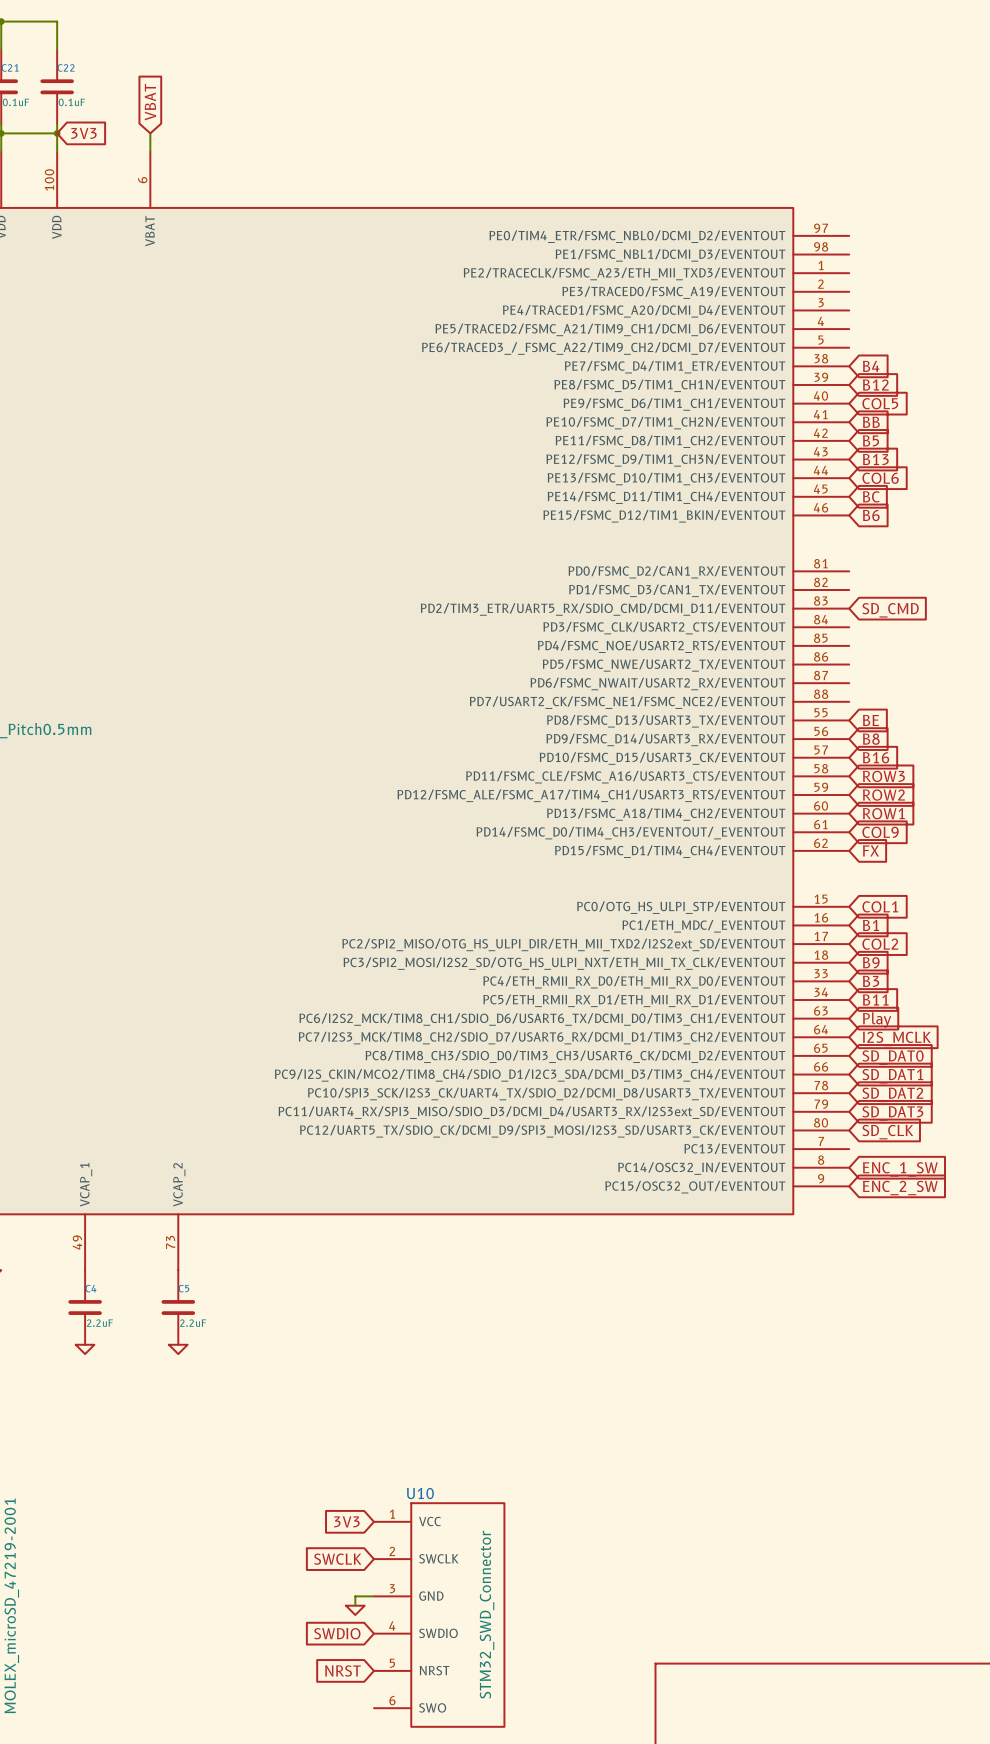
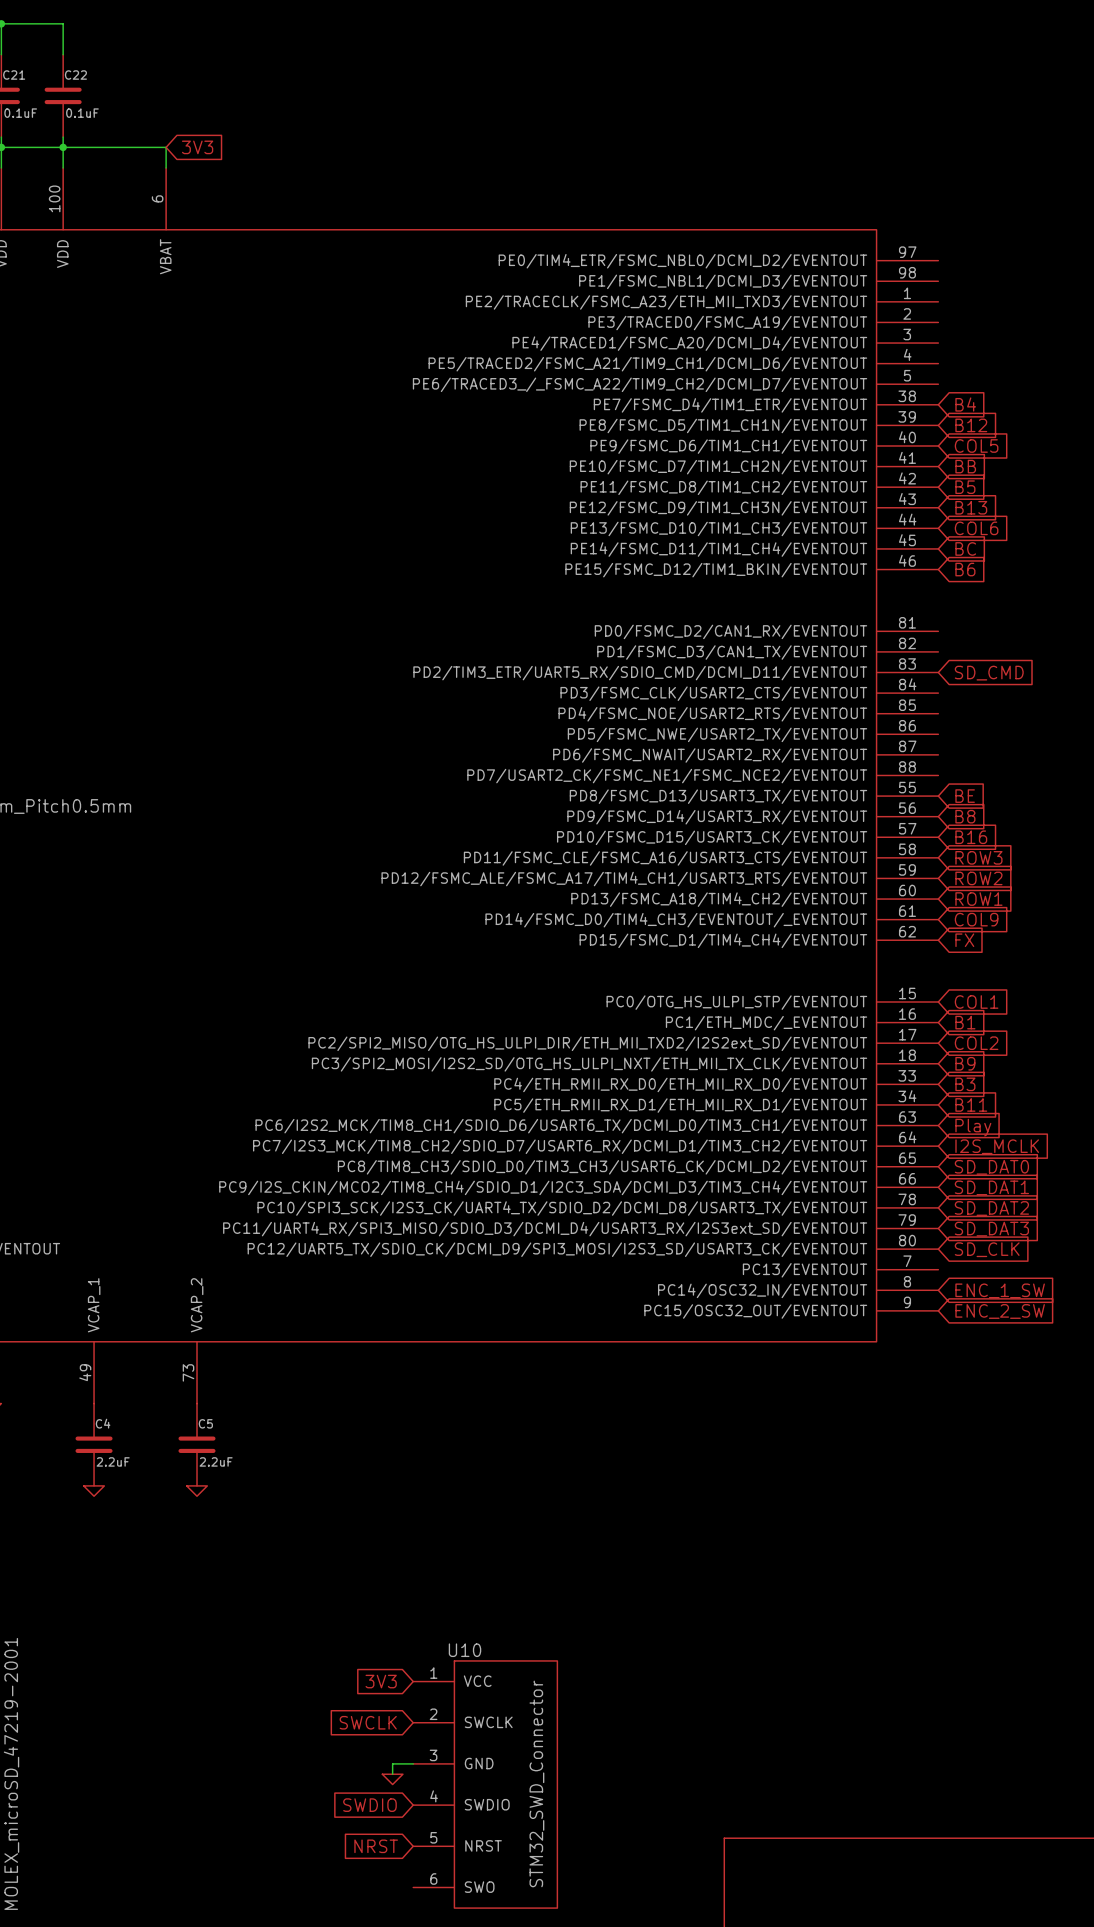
global label: VBAT (150, 102) -> 3V3 (197, 147)
wire: none -> (63, 147) (166, 147)
global label: 3V3 (83, 133) -> none

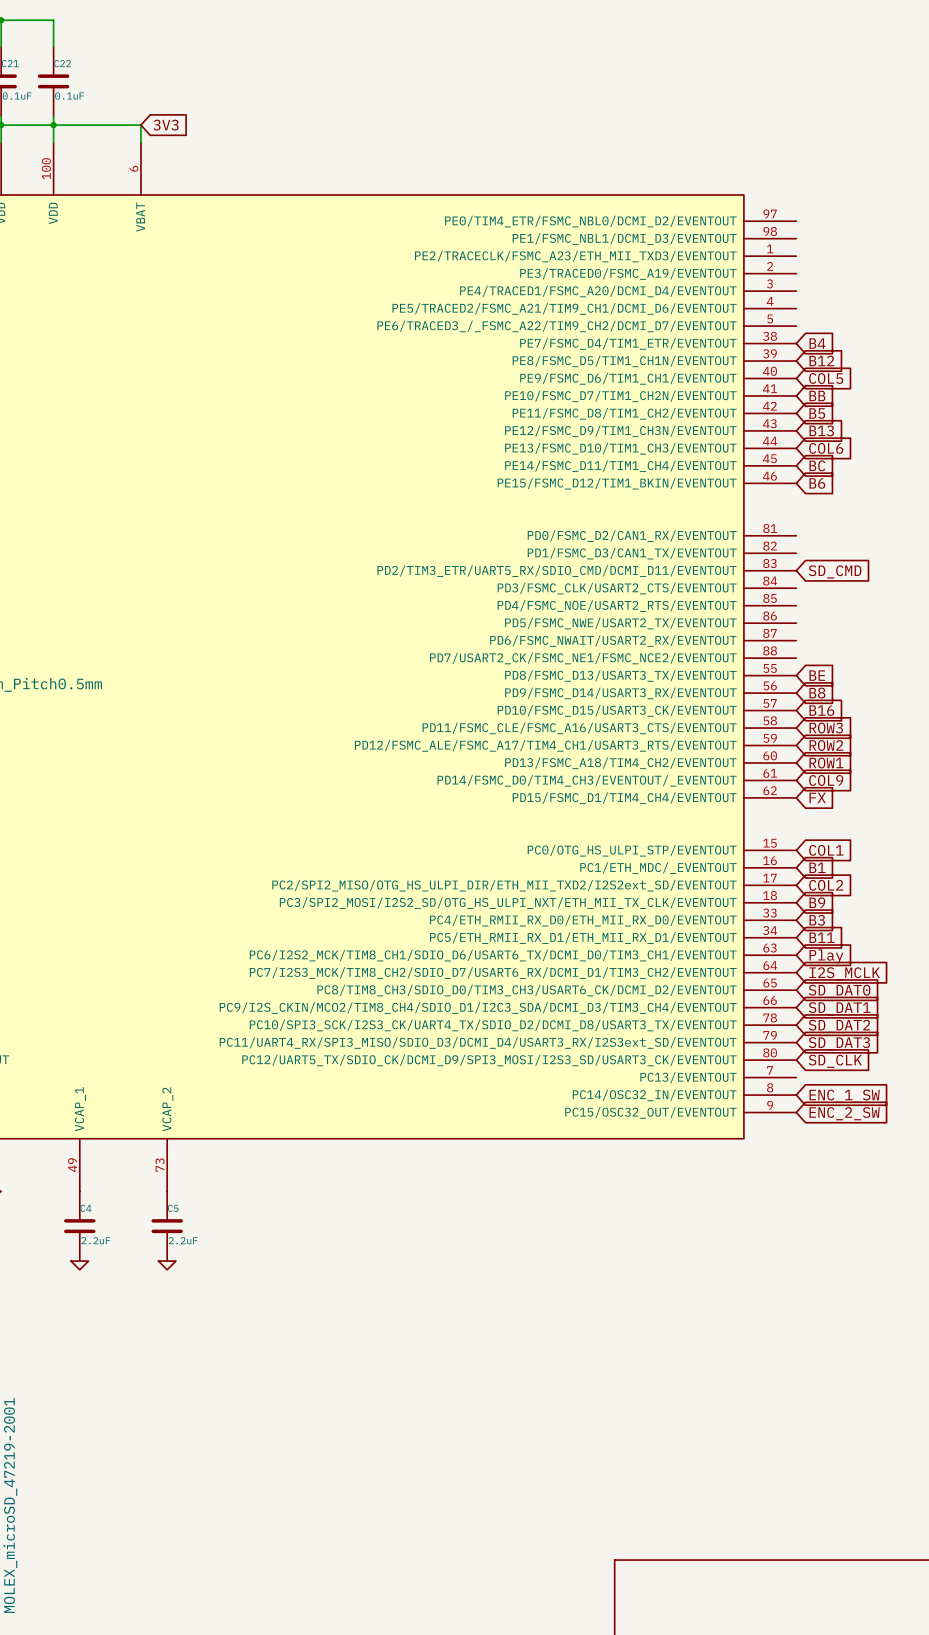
global label: 3V3 (381, 1681) -> none
global label: SWCLK (368, 1722) -> none
wire: (413, 1763) (392, 1763) (392, 1774) -> none
power symbol: (392, 1779) -> none
U10: STM32_SWD_Connector (485, 1784) -> none
global label: SWDIO (369, 1805) -> none
global label: NRST (376, 1846) -> none

